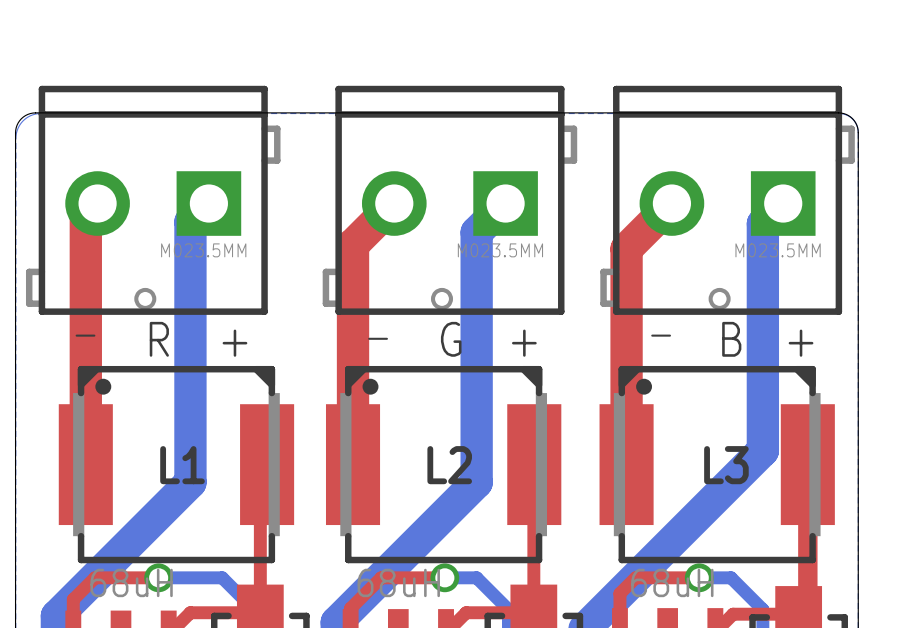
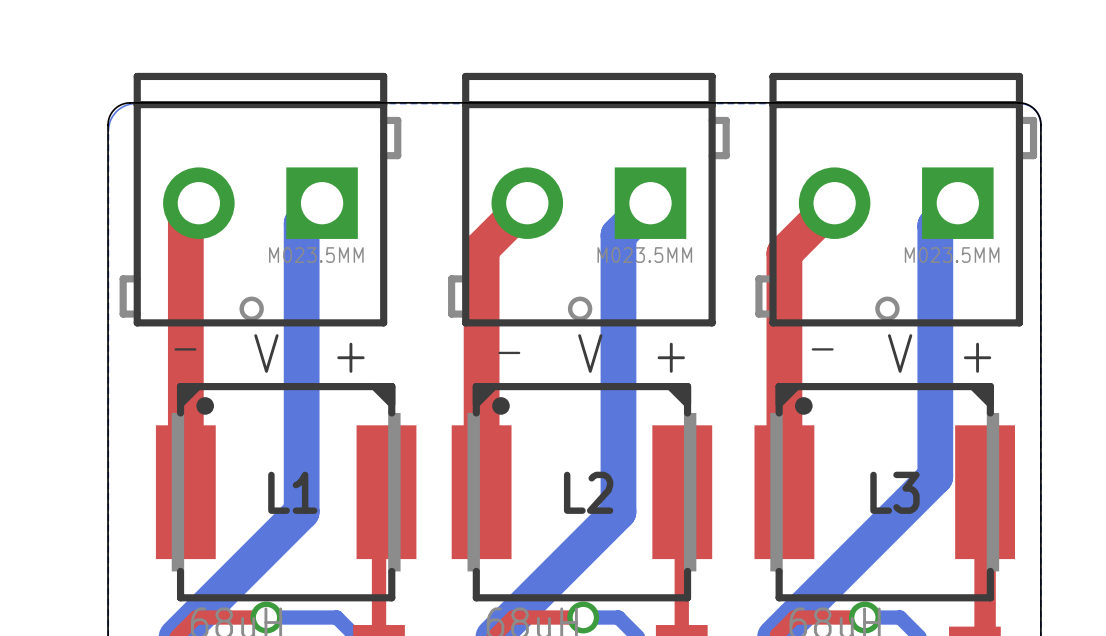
text: R (159, 339) -> V (266, 353)
text: G (451, 339) -> V (590, 353)
text: B (731, 339) -> V (900, 353)

